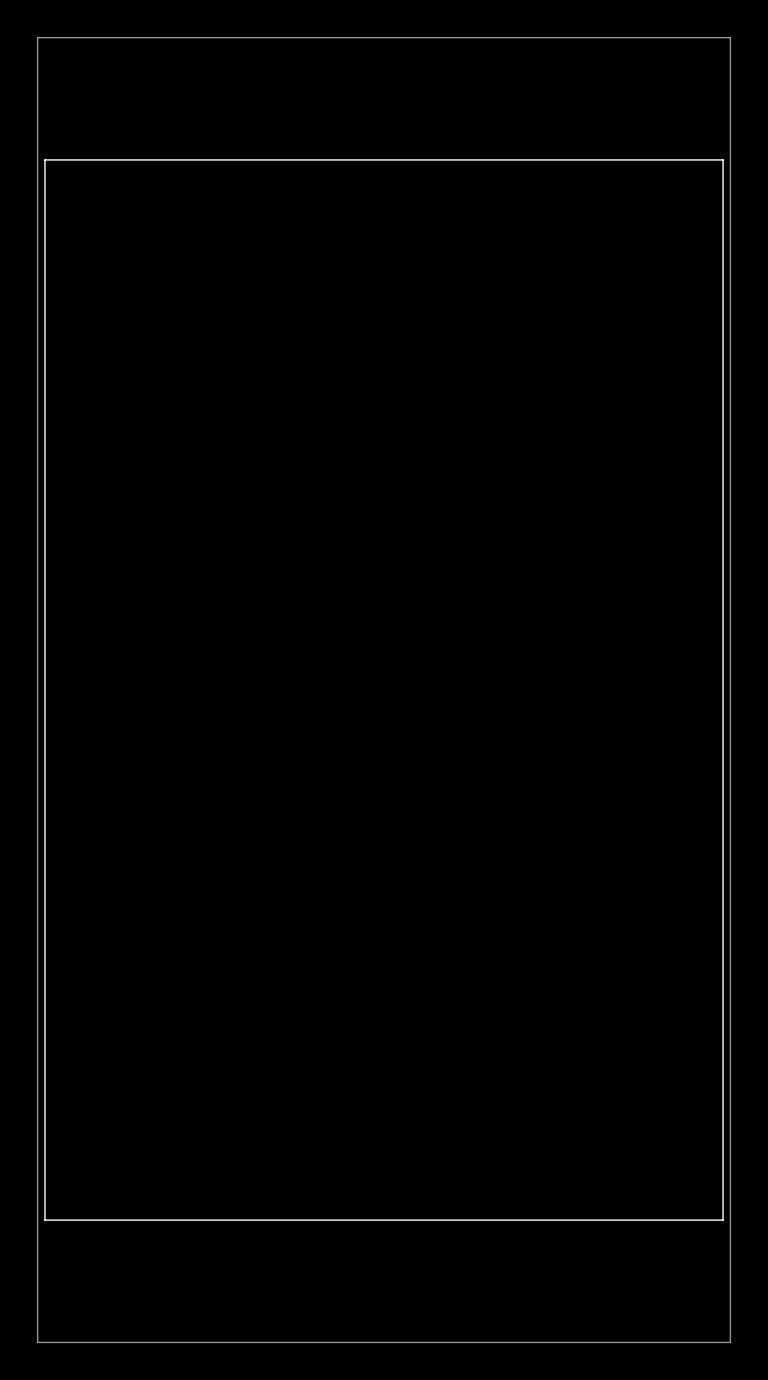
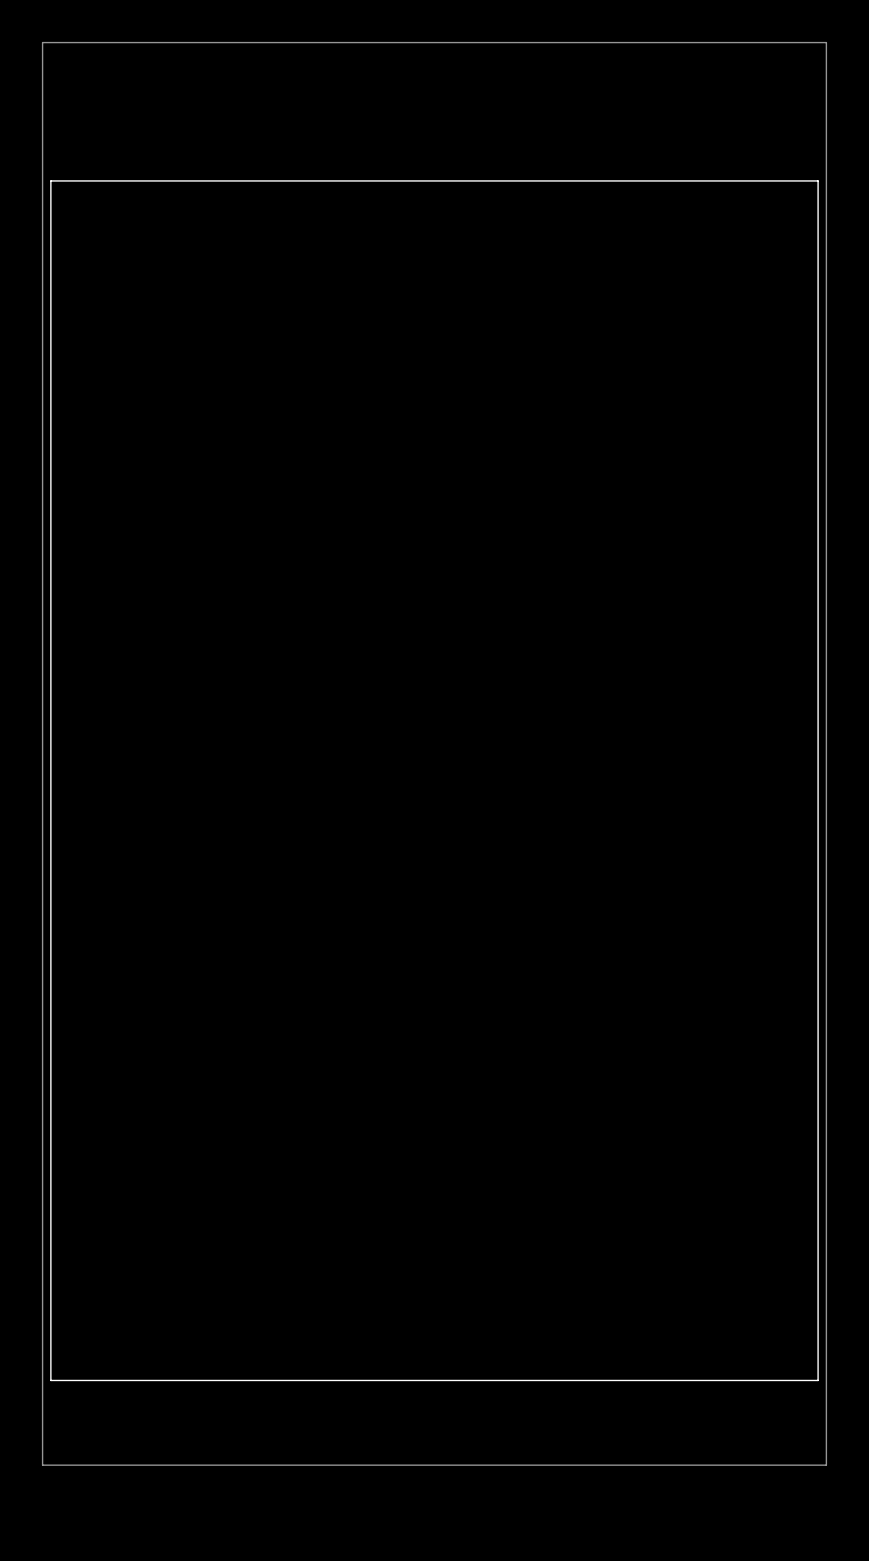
line: (37, 1294) (37, 1342) (730, 1342) (730, 1294) -> (42, 1465) (826, 1465)

